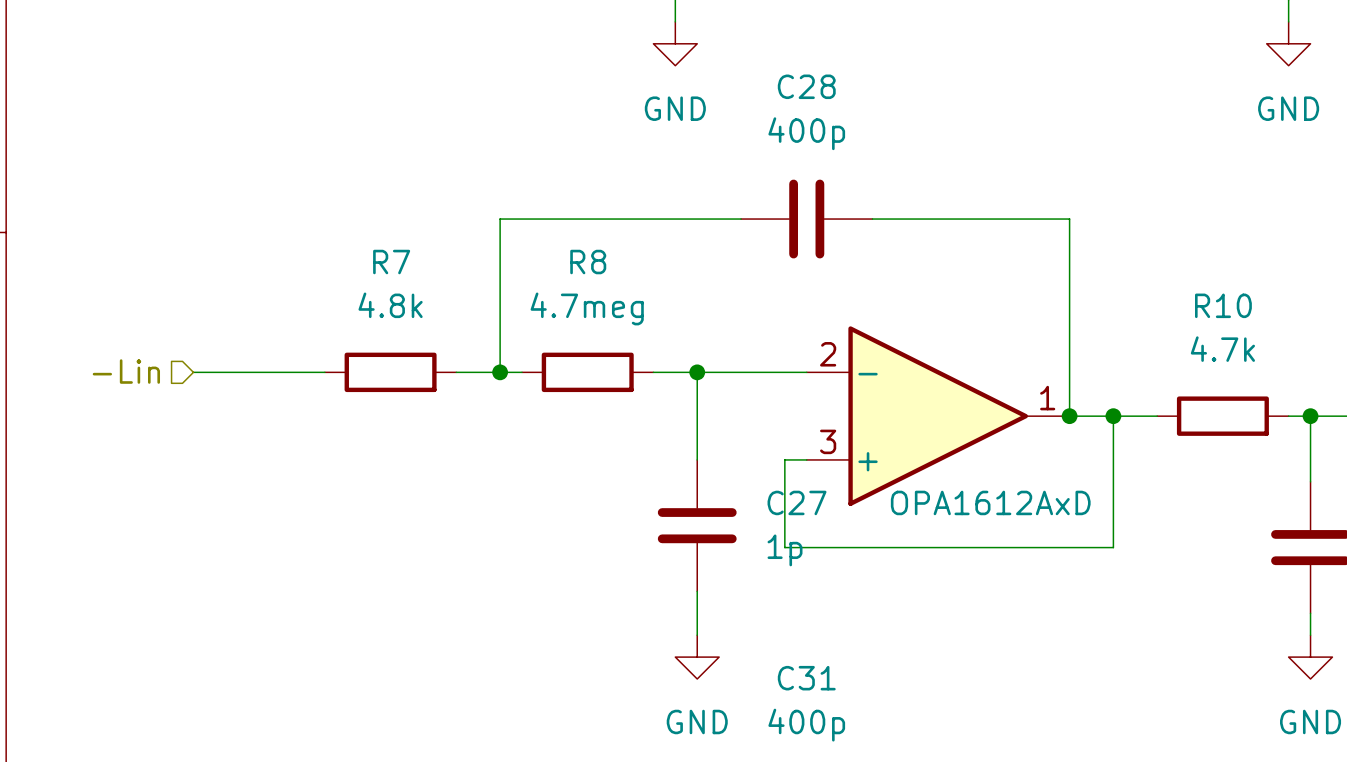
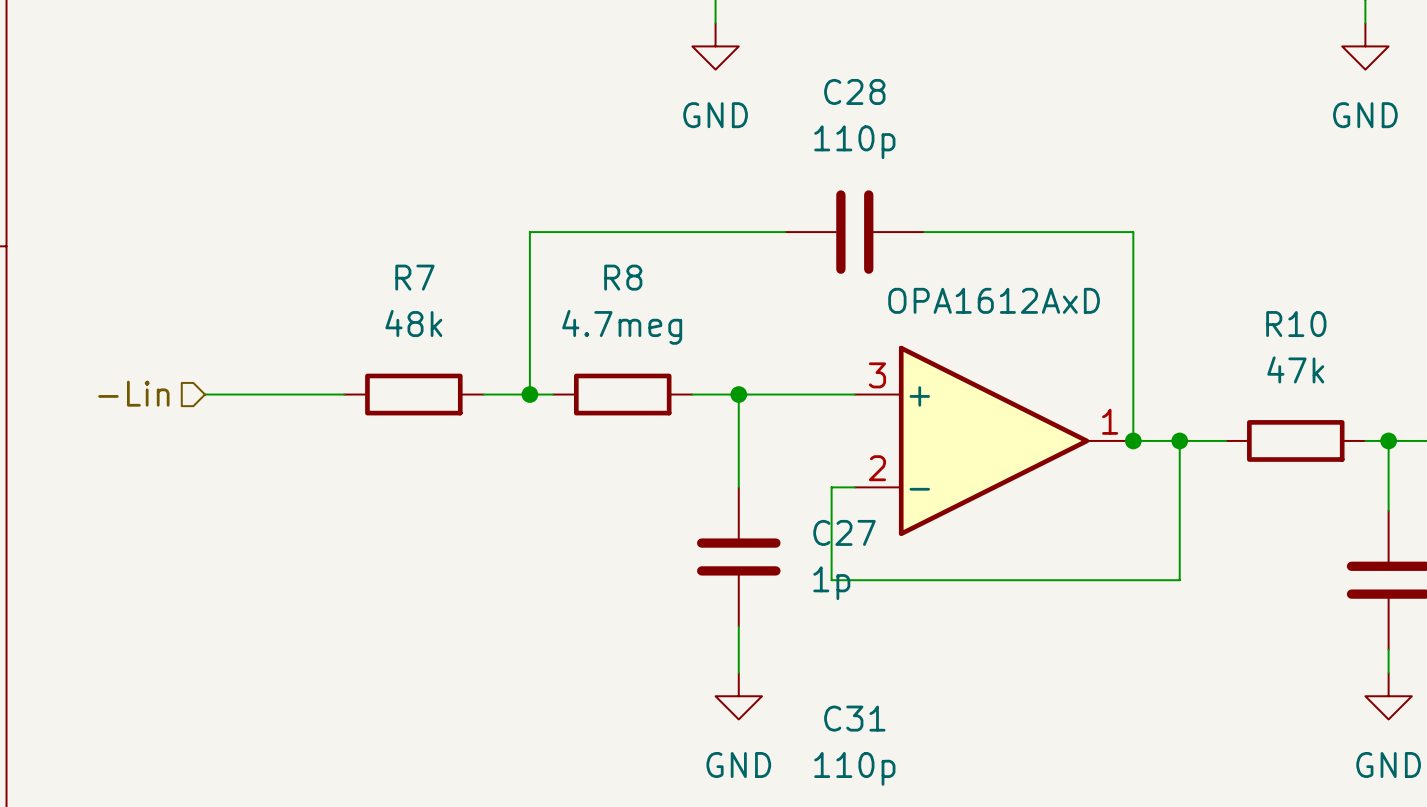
C28 value: 400p (806, 133) -> 110p (854, 142)
R7 value: 4.8k (390, 305) -> 48k (413, 323)
R10 value: 4.7k (1222, 349) -> 47k (1295, 369)
part flip: as is (938, 416) -> up-down (994, 440)
part value position: OPA1612AxD (990, 502) -> OPA1612AxD (994, 300)
C31 value: 400p (806, 725) -> 110p (854, 768)

